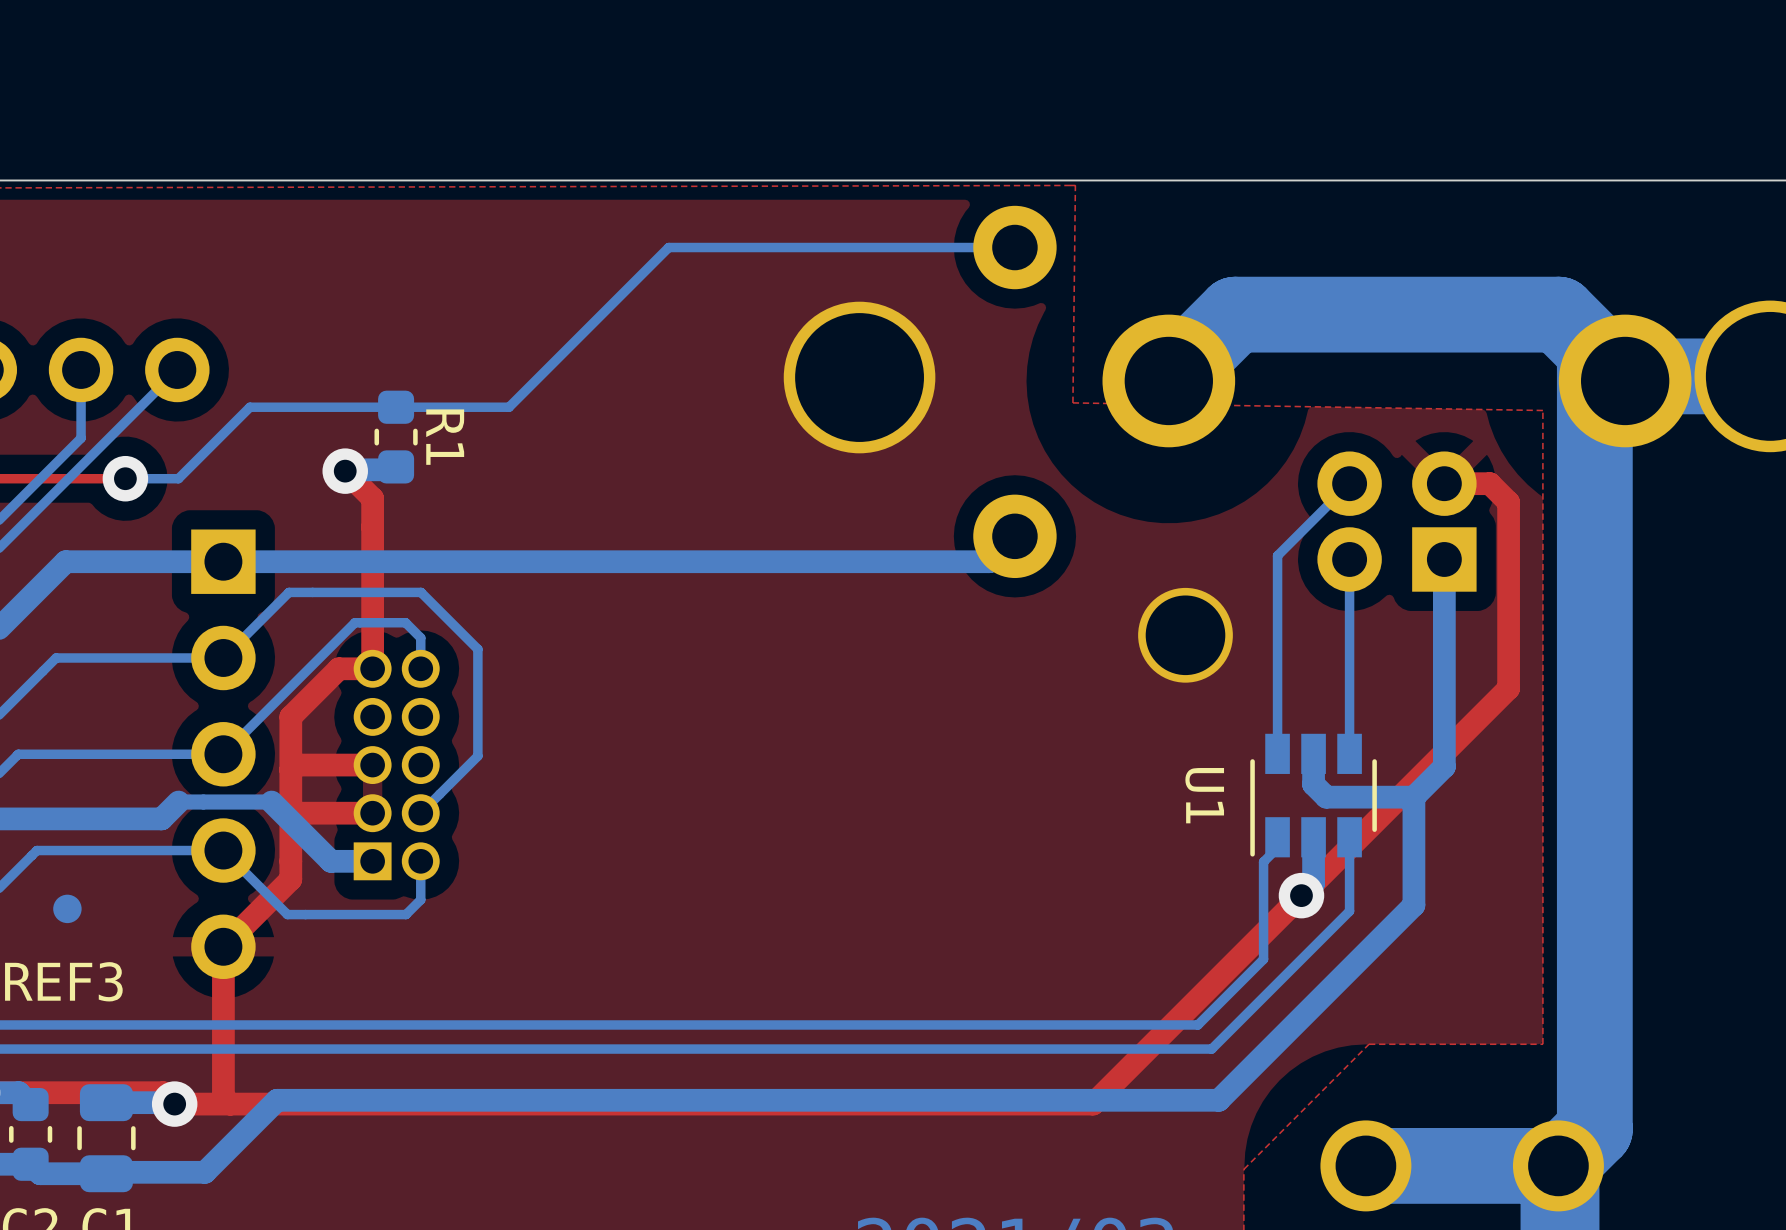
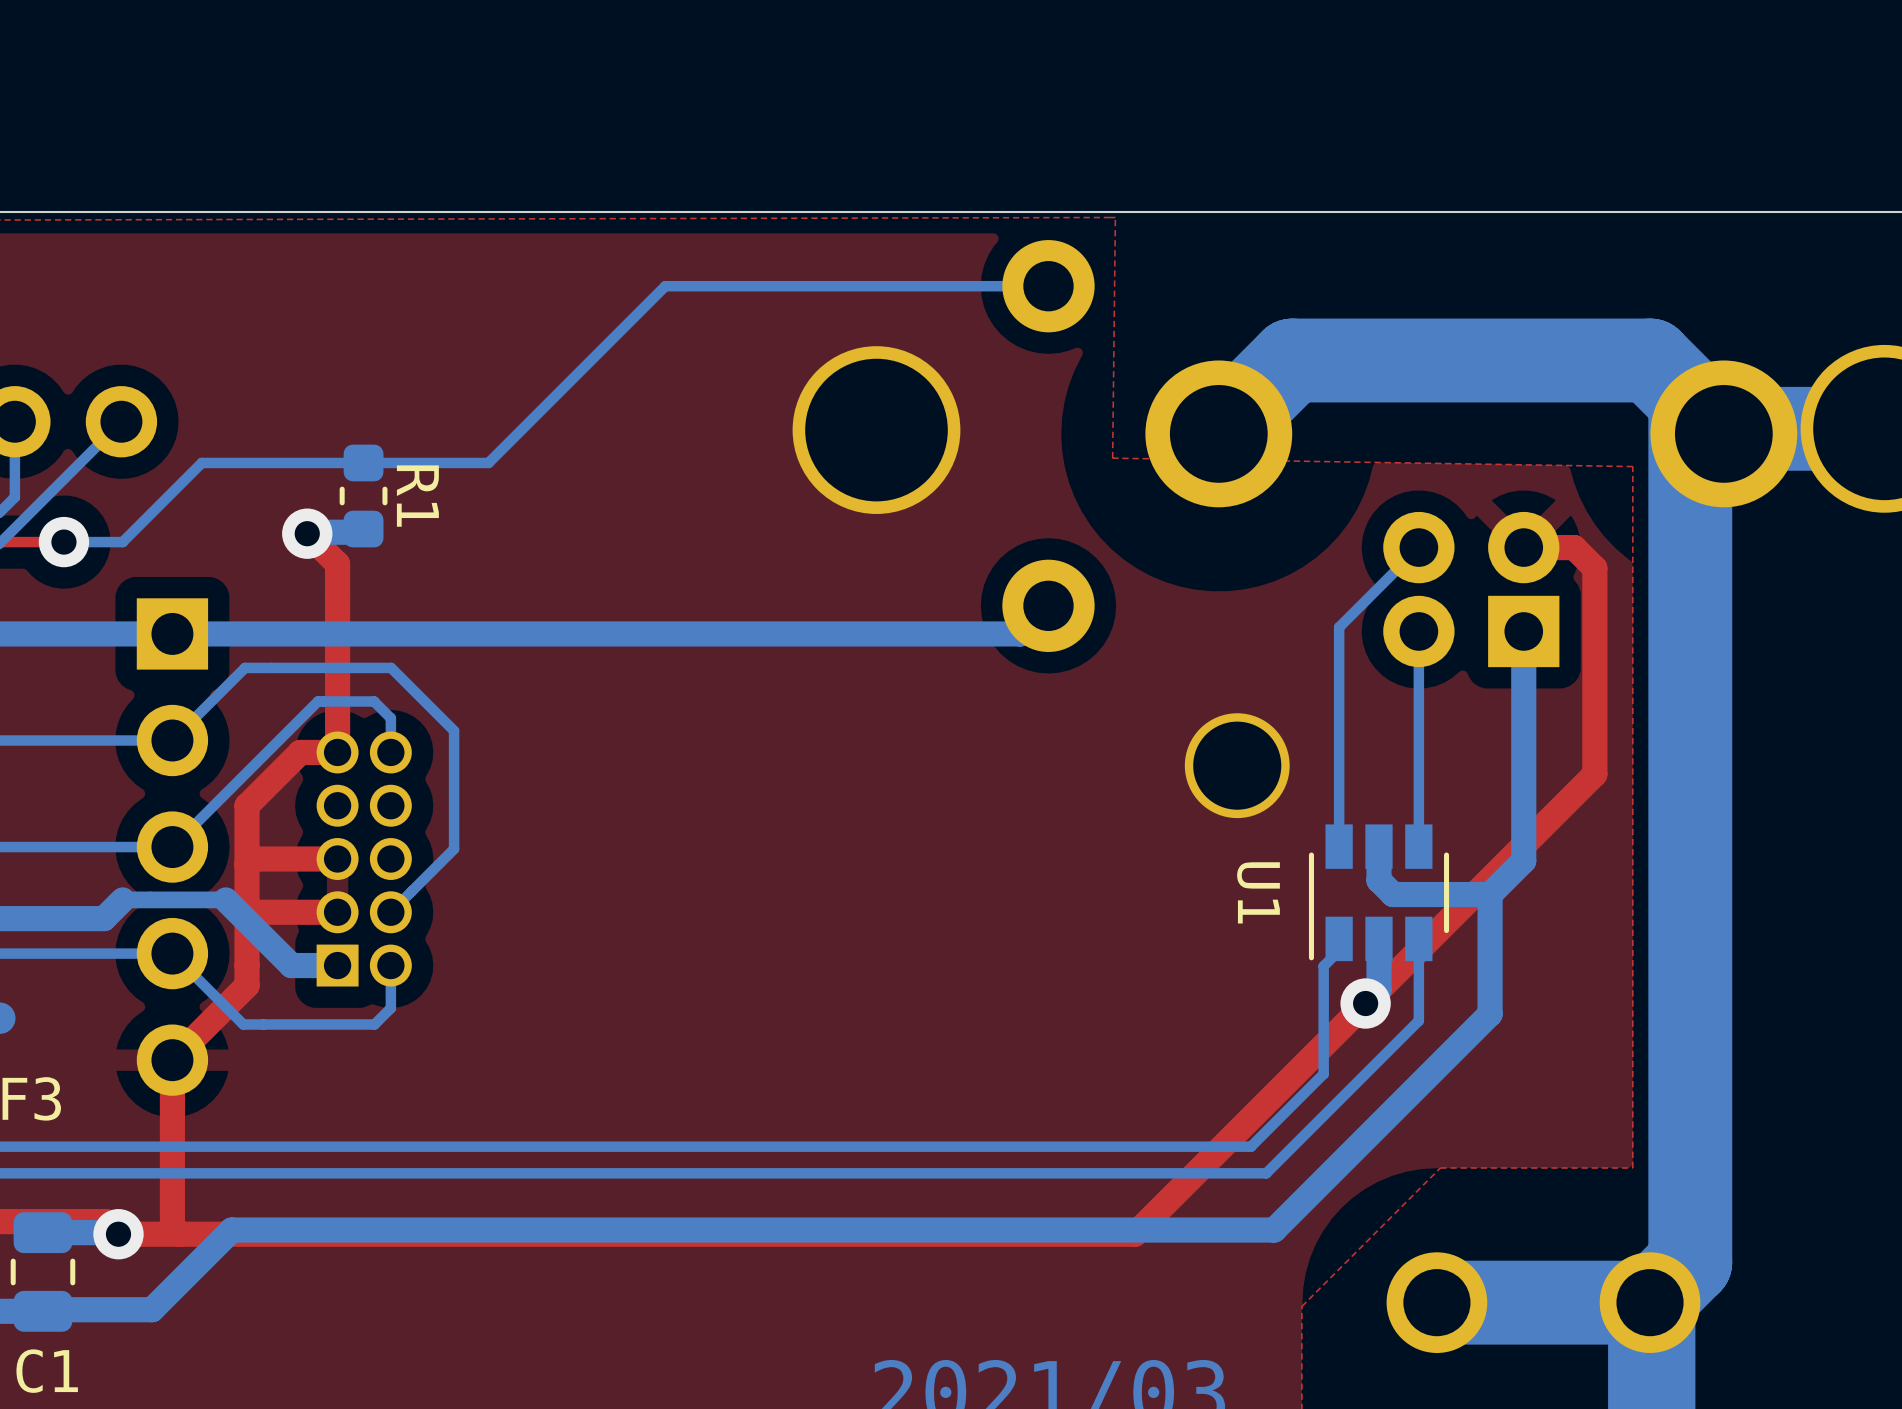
part position: (1185, 635) -> (1237, 765)

